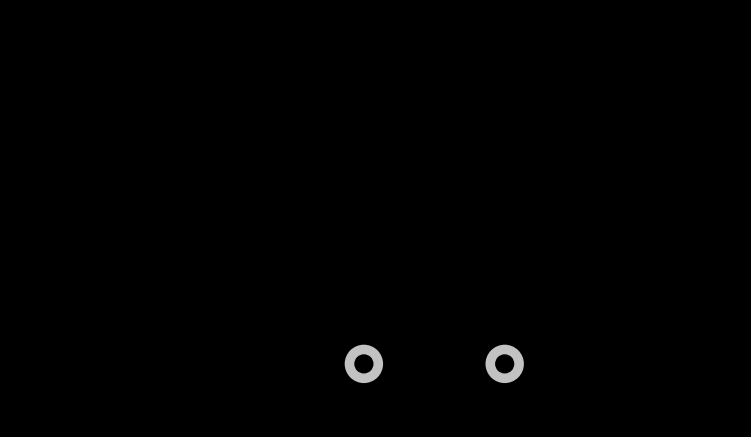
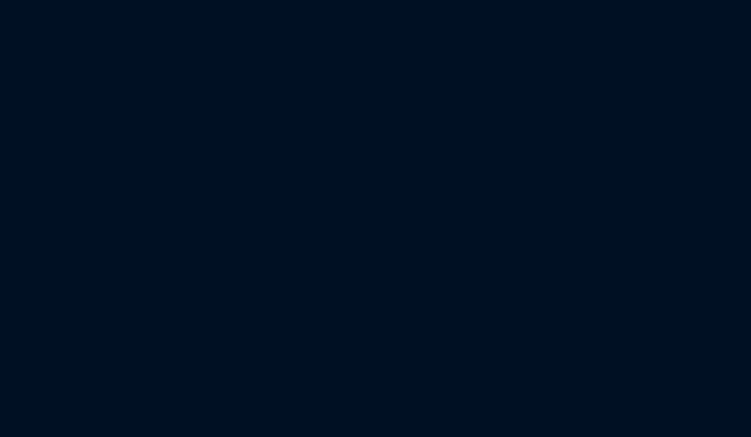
via: (363, 363) -> none
via: (504, 363) -> none

